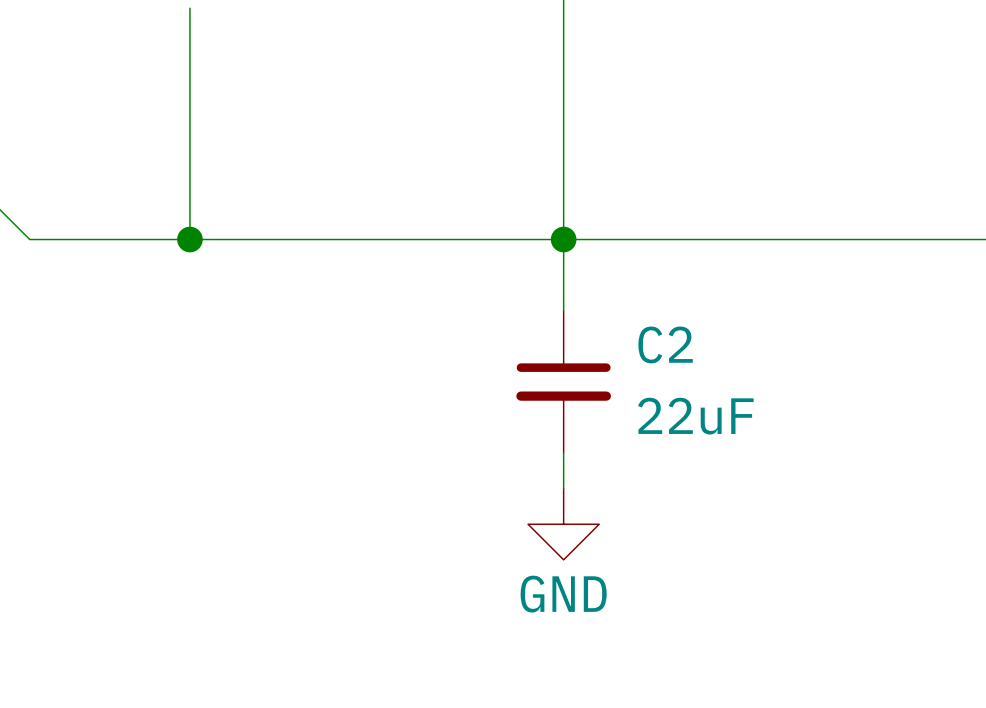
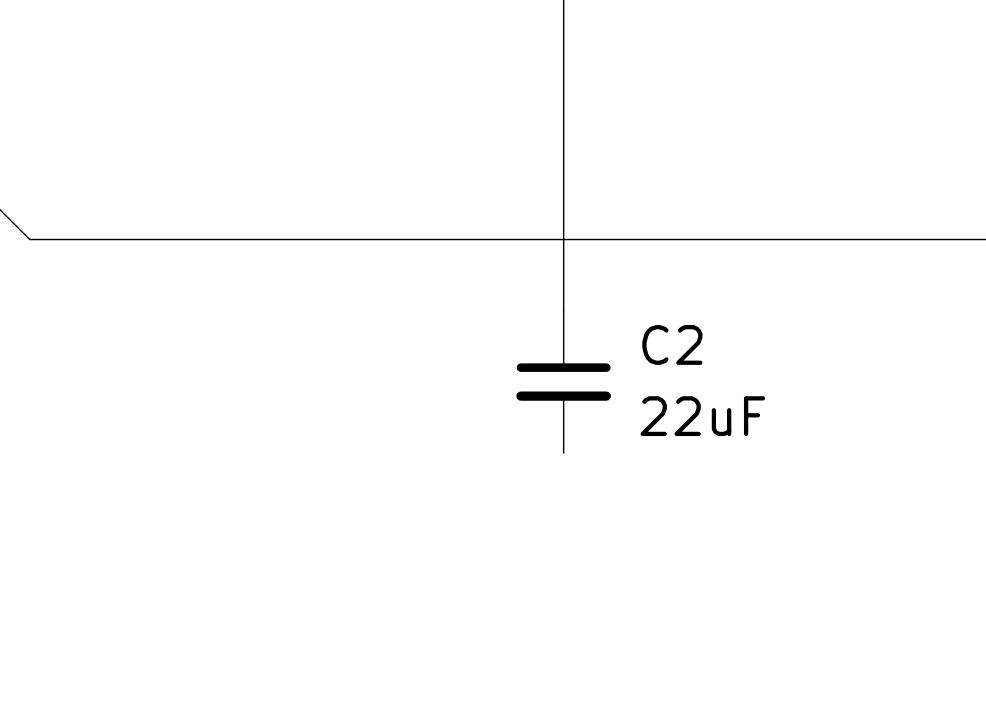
wire: (189, 8) (189, 239) -> none
junction: (189, 239) -> none
junction: (563, 239) -> none
wire: (563, 453) (563, 488) -> none
power symbol: GND (563, 524) -> none

